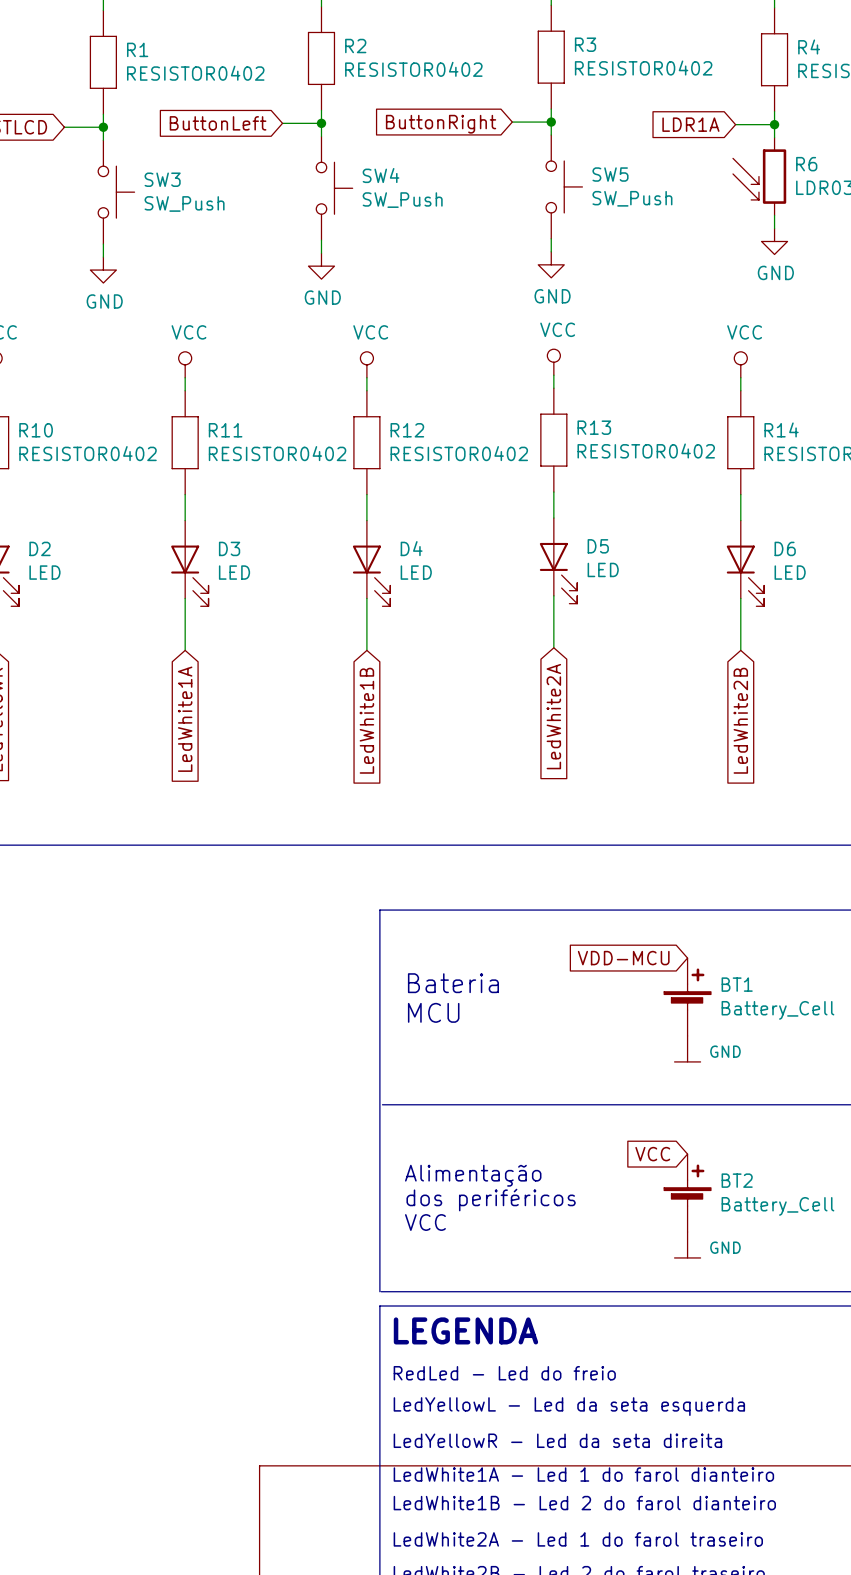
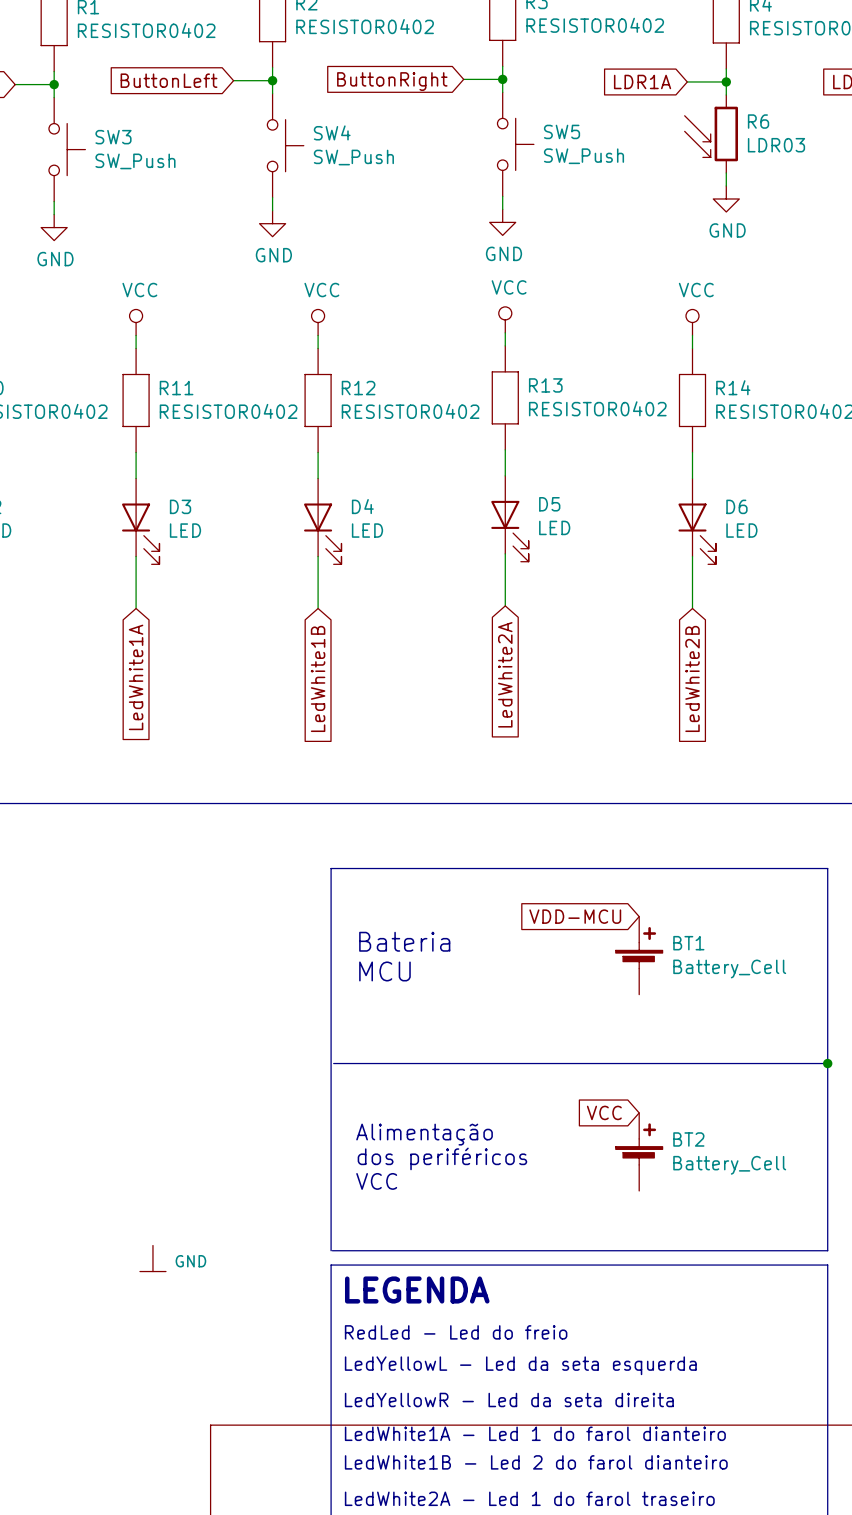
power symbol: GND (687, 1048) -> none
power symbol: GND (687, 1244) -> none
power symbol: none -> GND (152, 1258)

